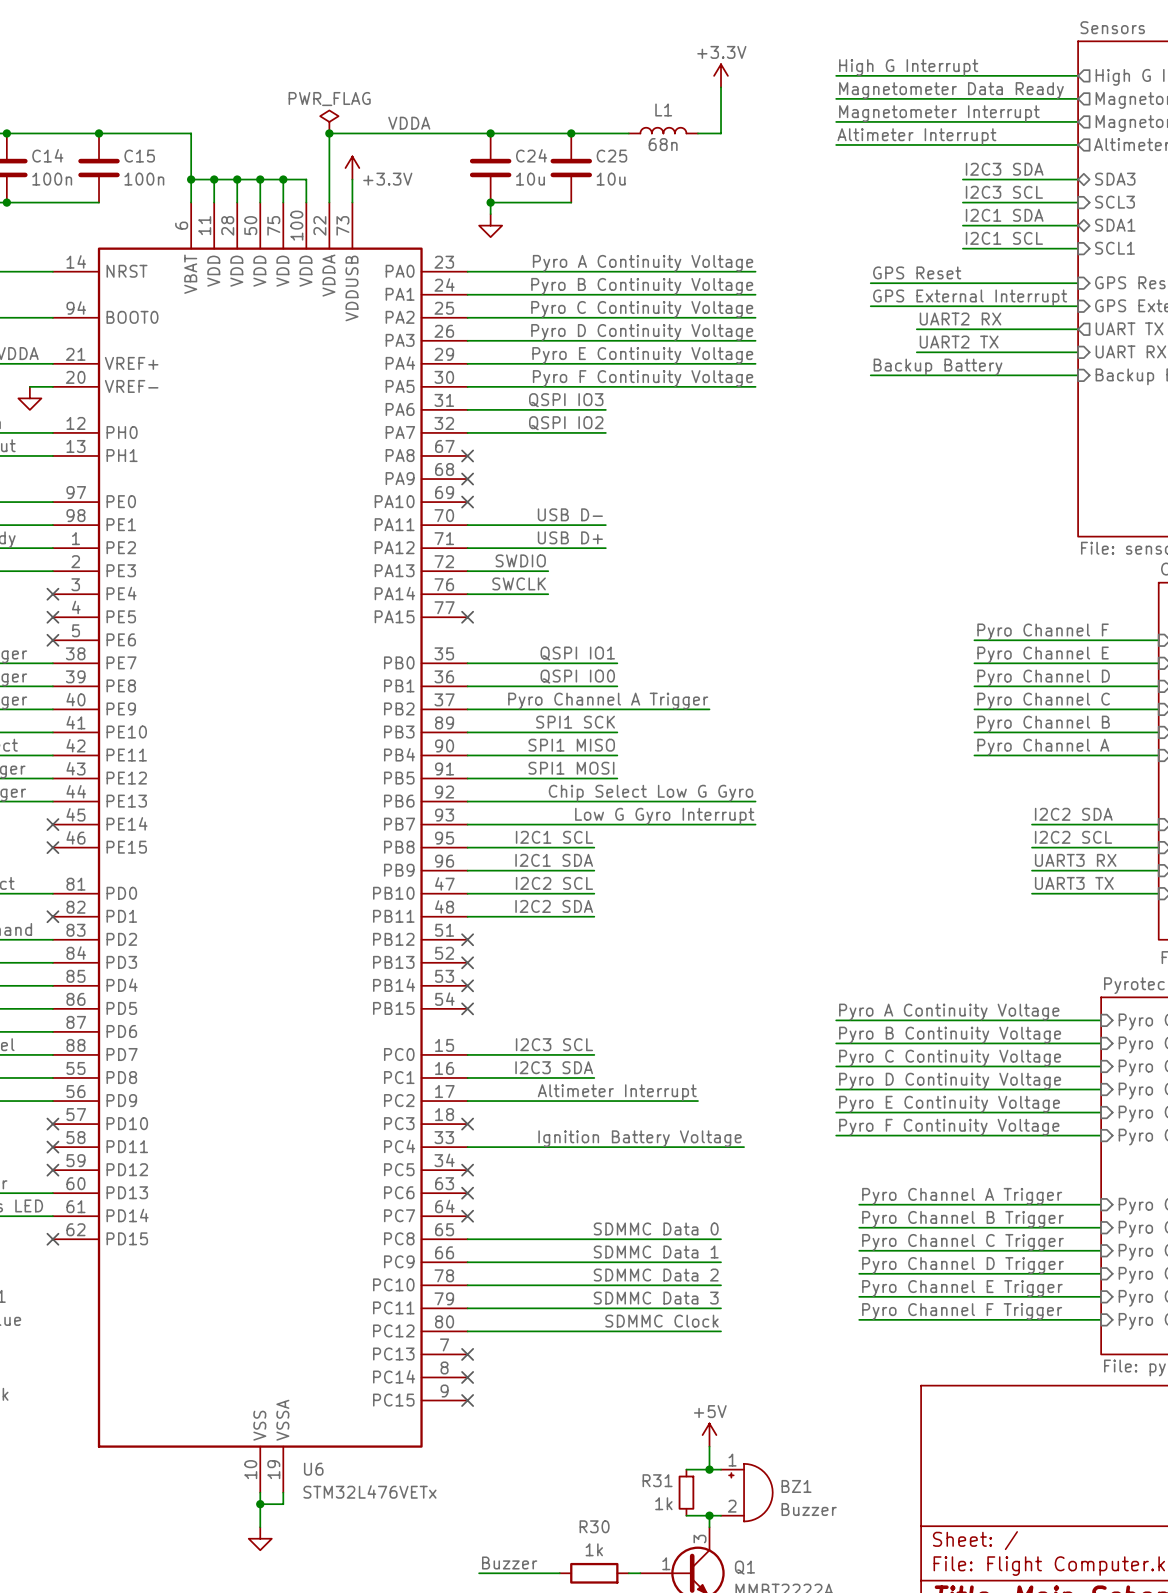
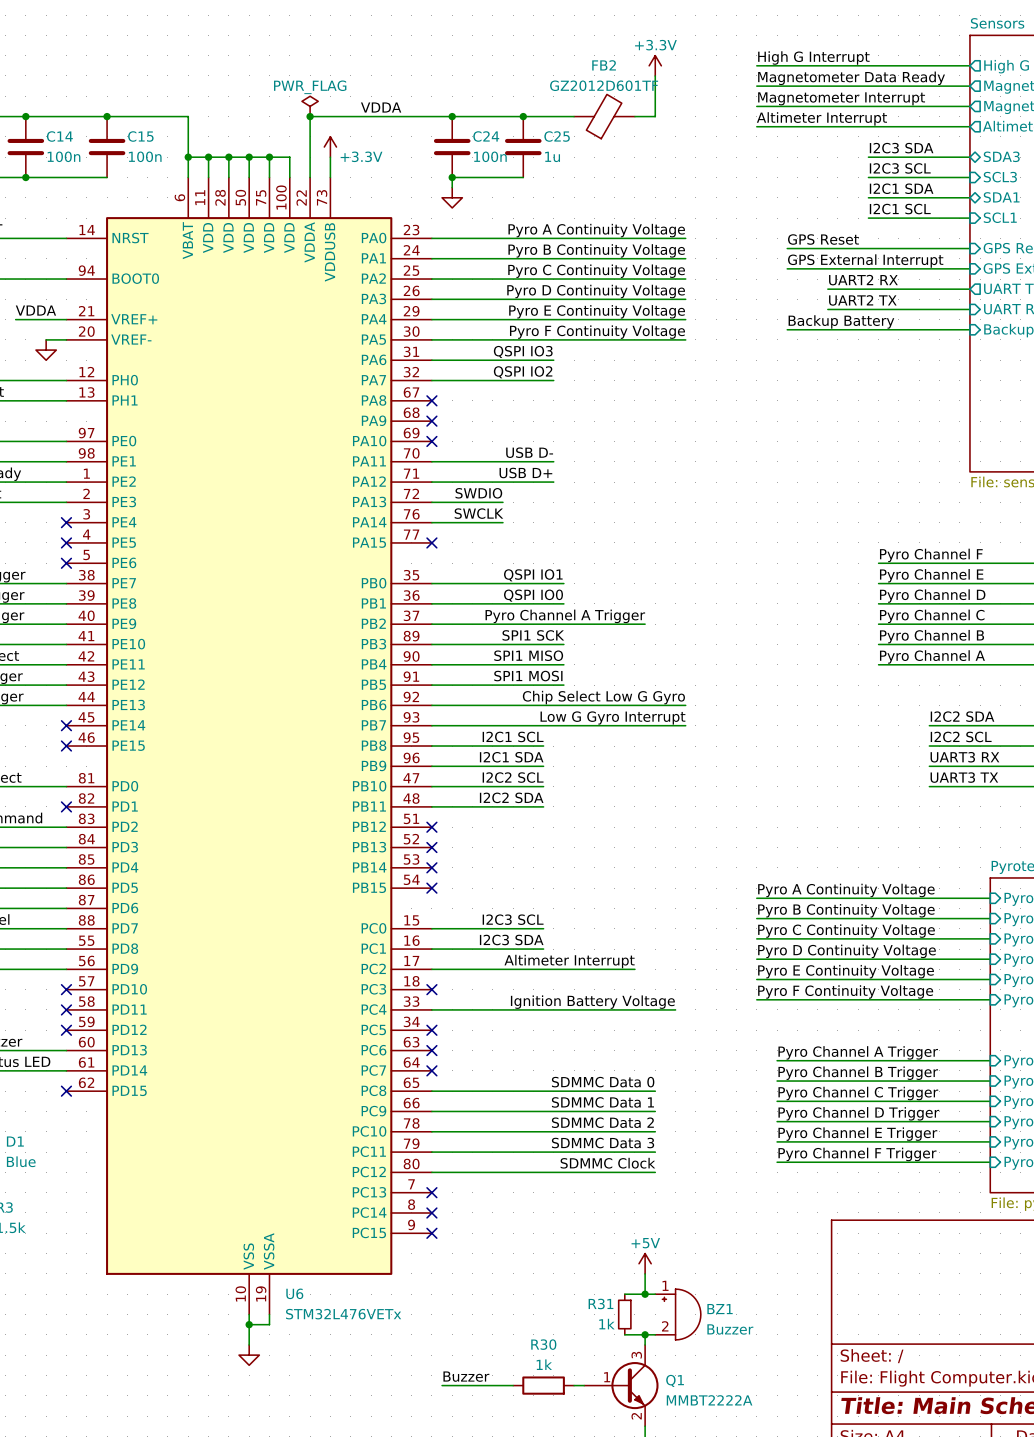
L1: 68n (663, 130) -> none
FB2: none -> GZ2012D601TF (604, 116)
C24 value: 10u (530, 179) -> 100n (490, 156)
C25 value: 10u (611, 179) -> 1u (552, 156)

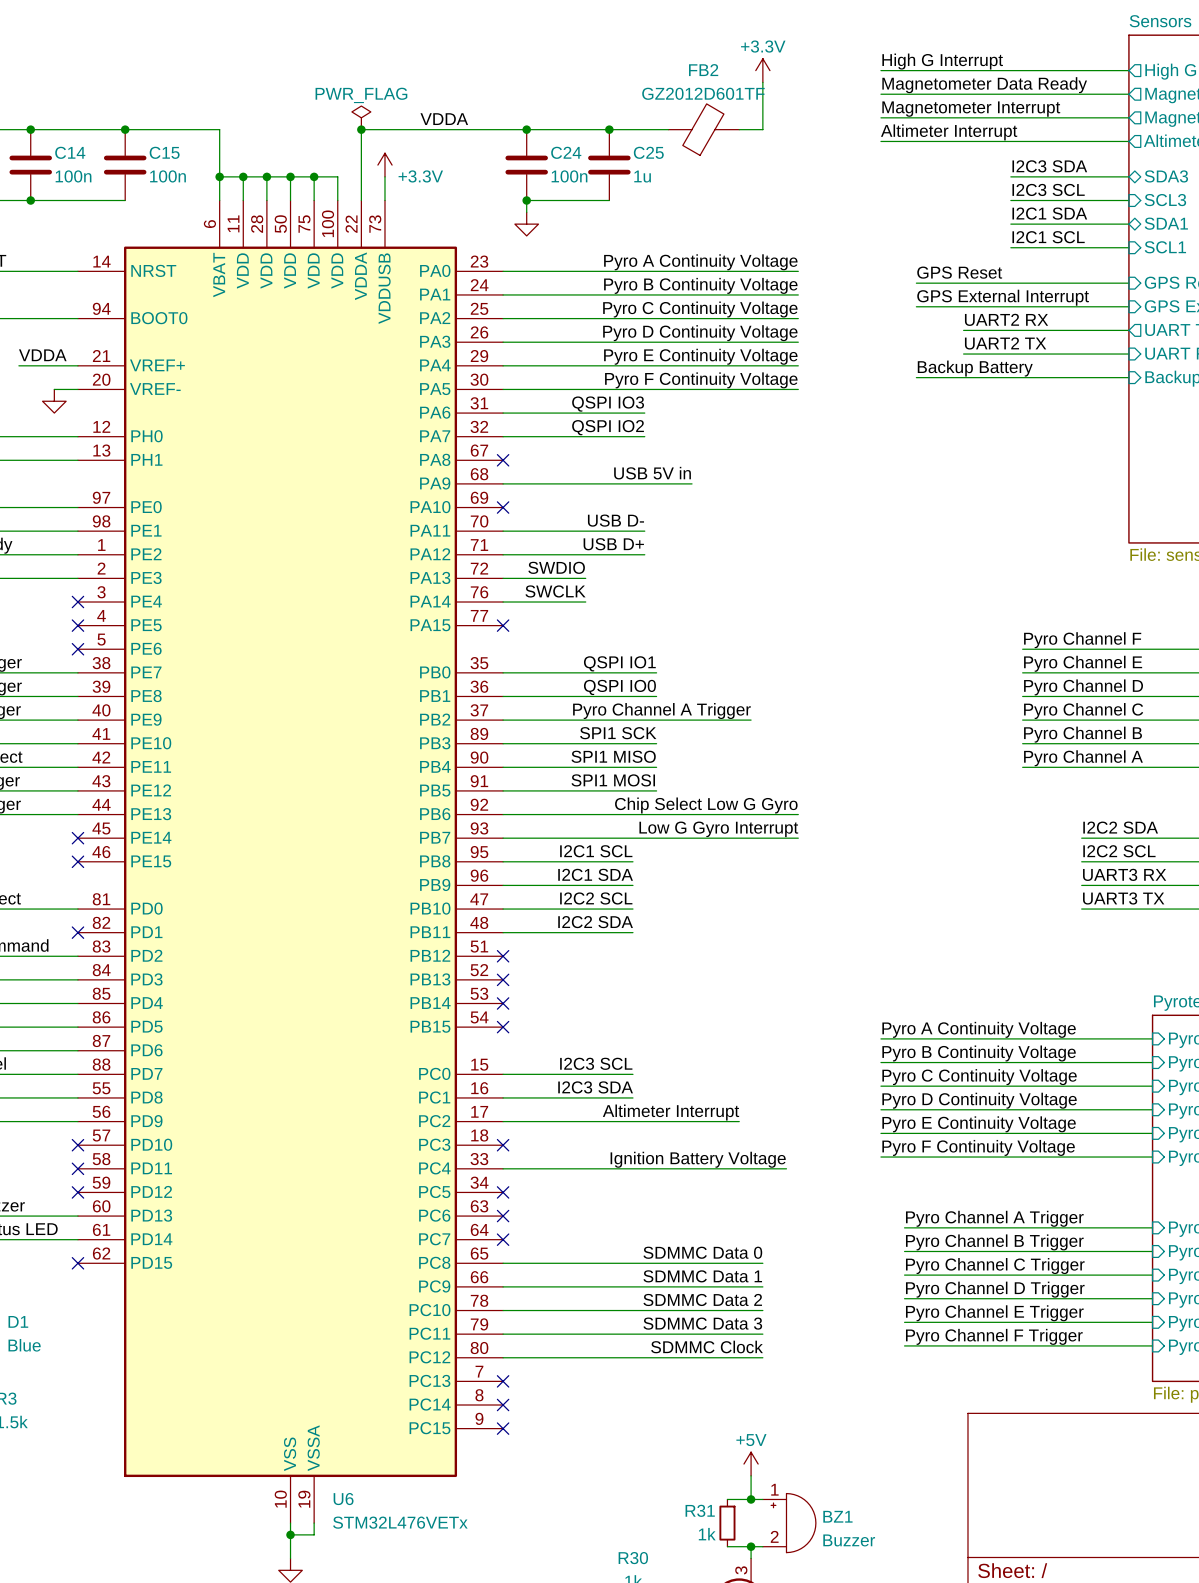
label: none -> USB 5V in (652, 473)
wire: none -> (503, 483) (692, 483)
no-connect mark: (431, 421) -> none

